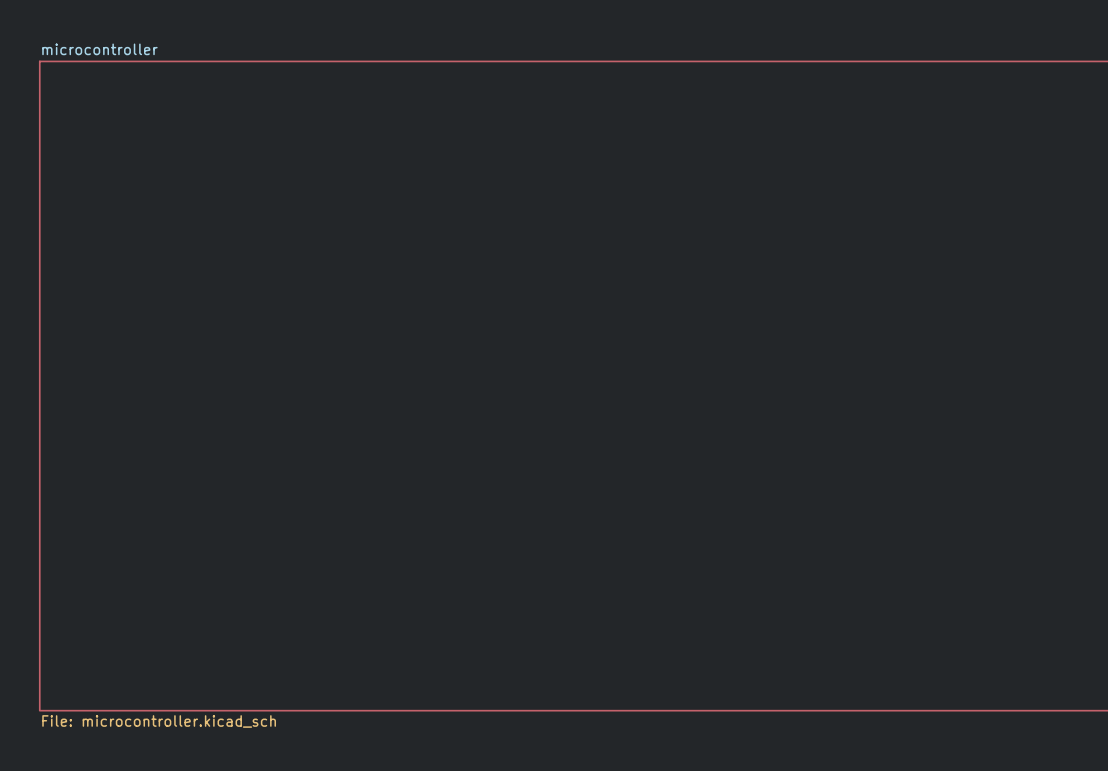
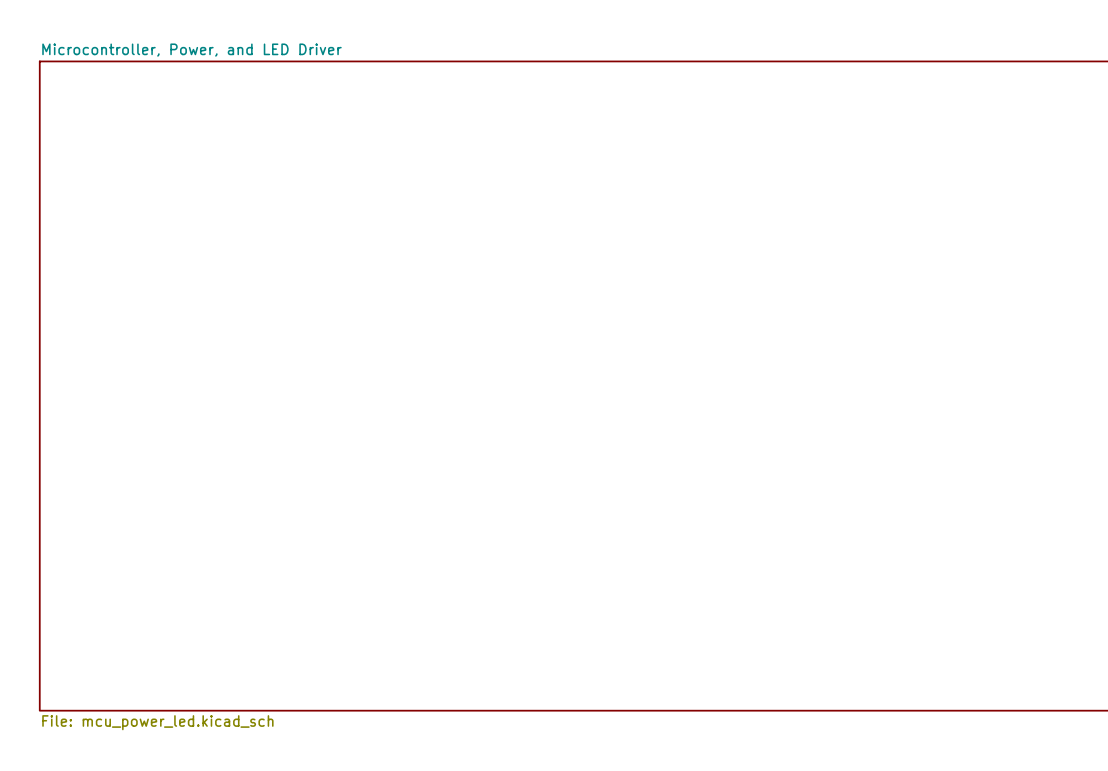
sheet microcontroller name: microcontroller (99, 49) -> Microcontroller, Power, and LED Driver (191, 50)
sheet microcontroller value: File: microcontroller.kicad_sch (159, 721) -> File: mcu_power_led.kicad_sch (157, 722)

